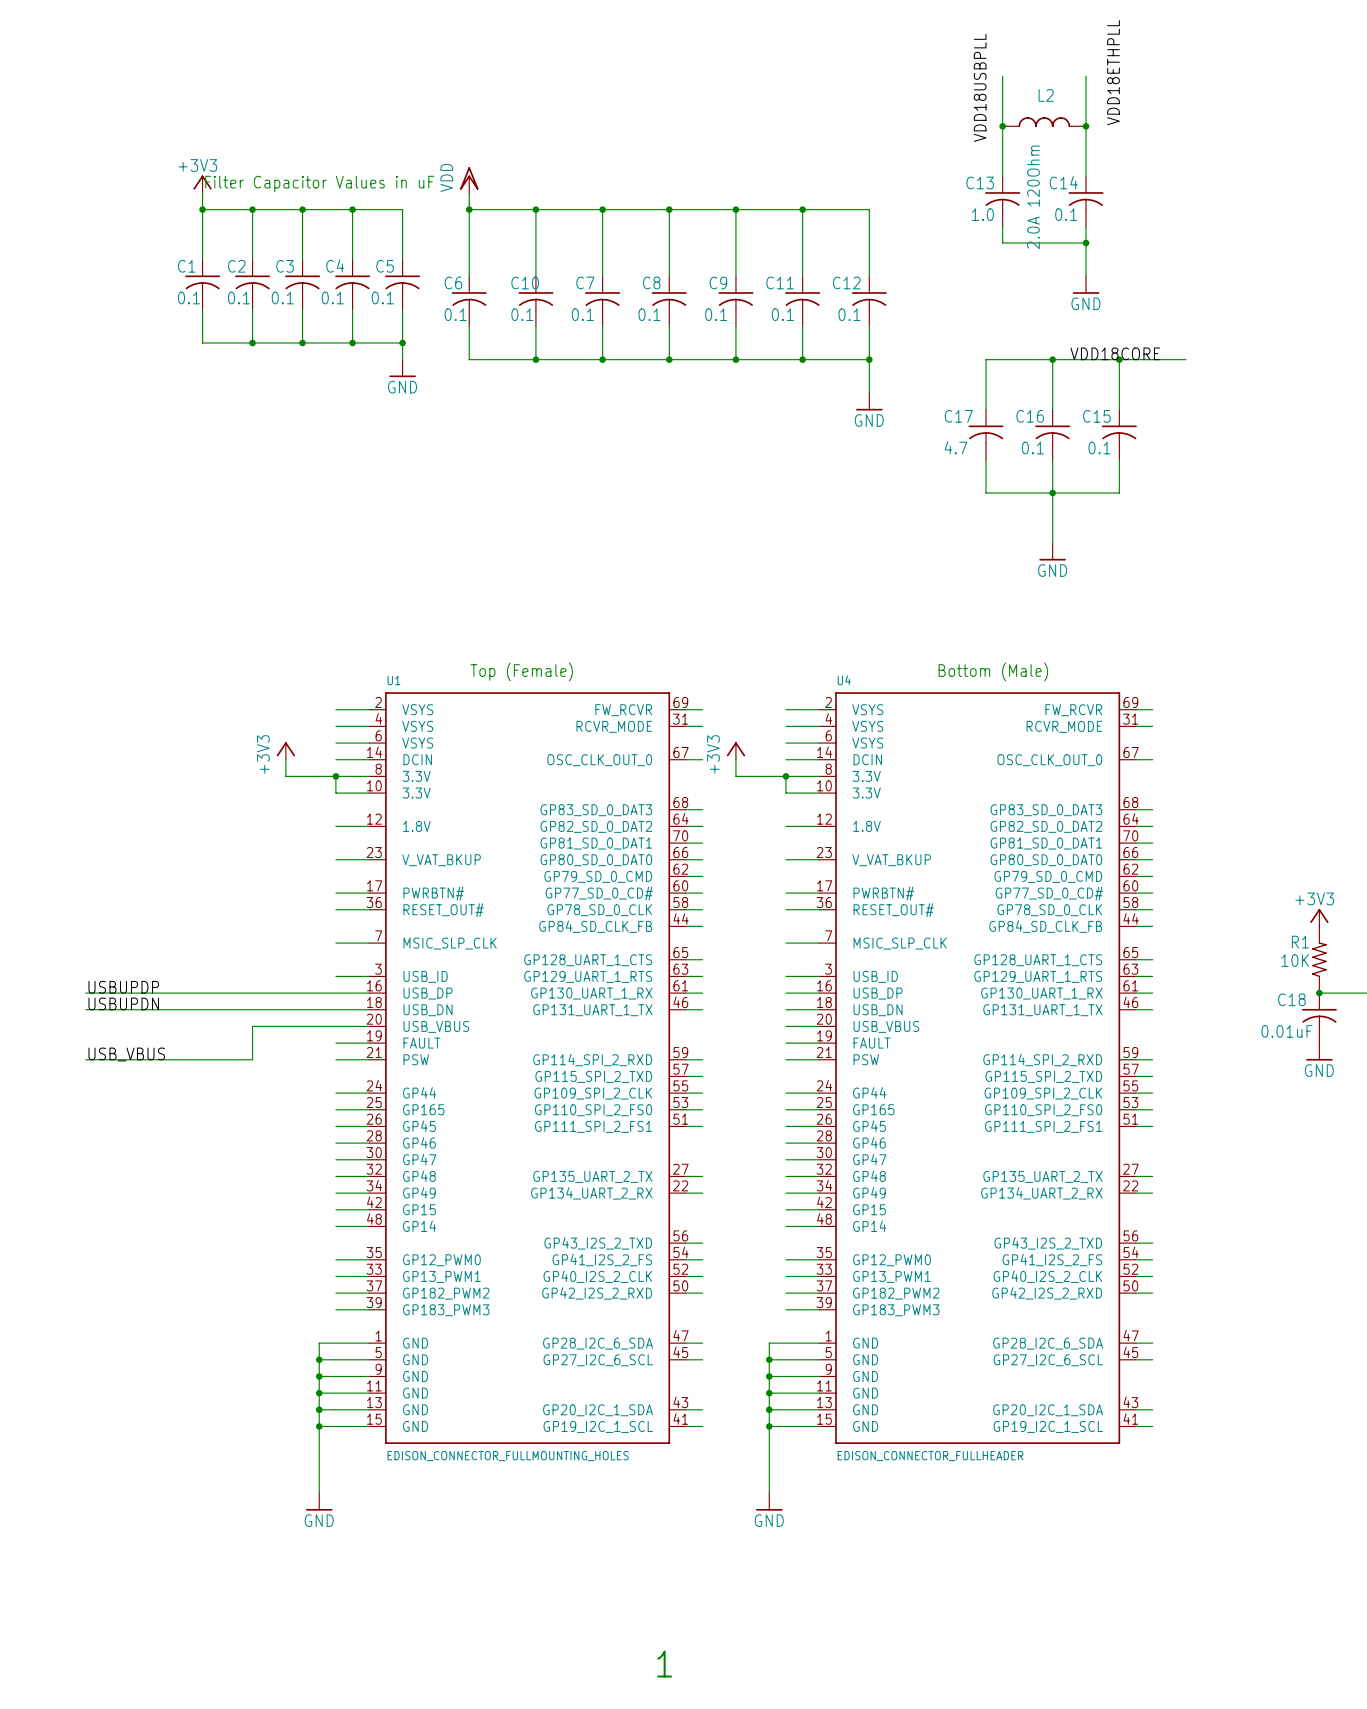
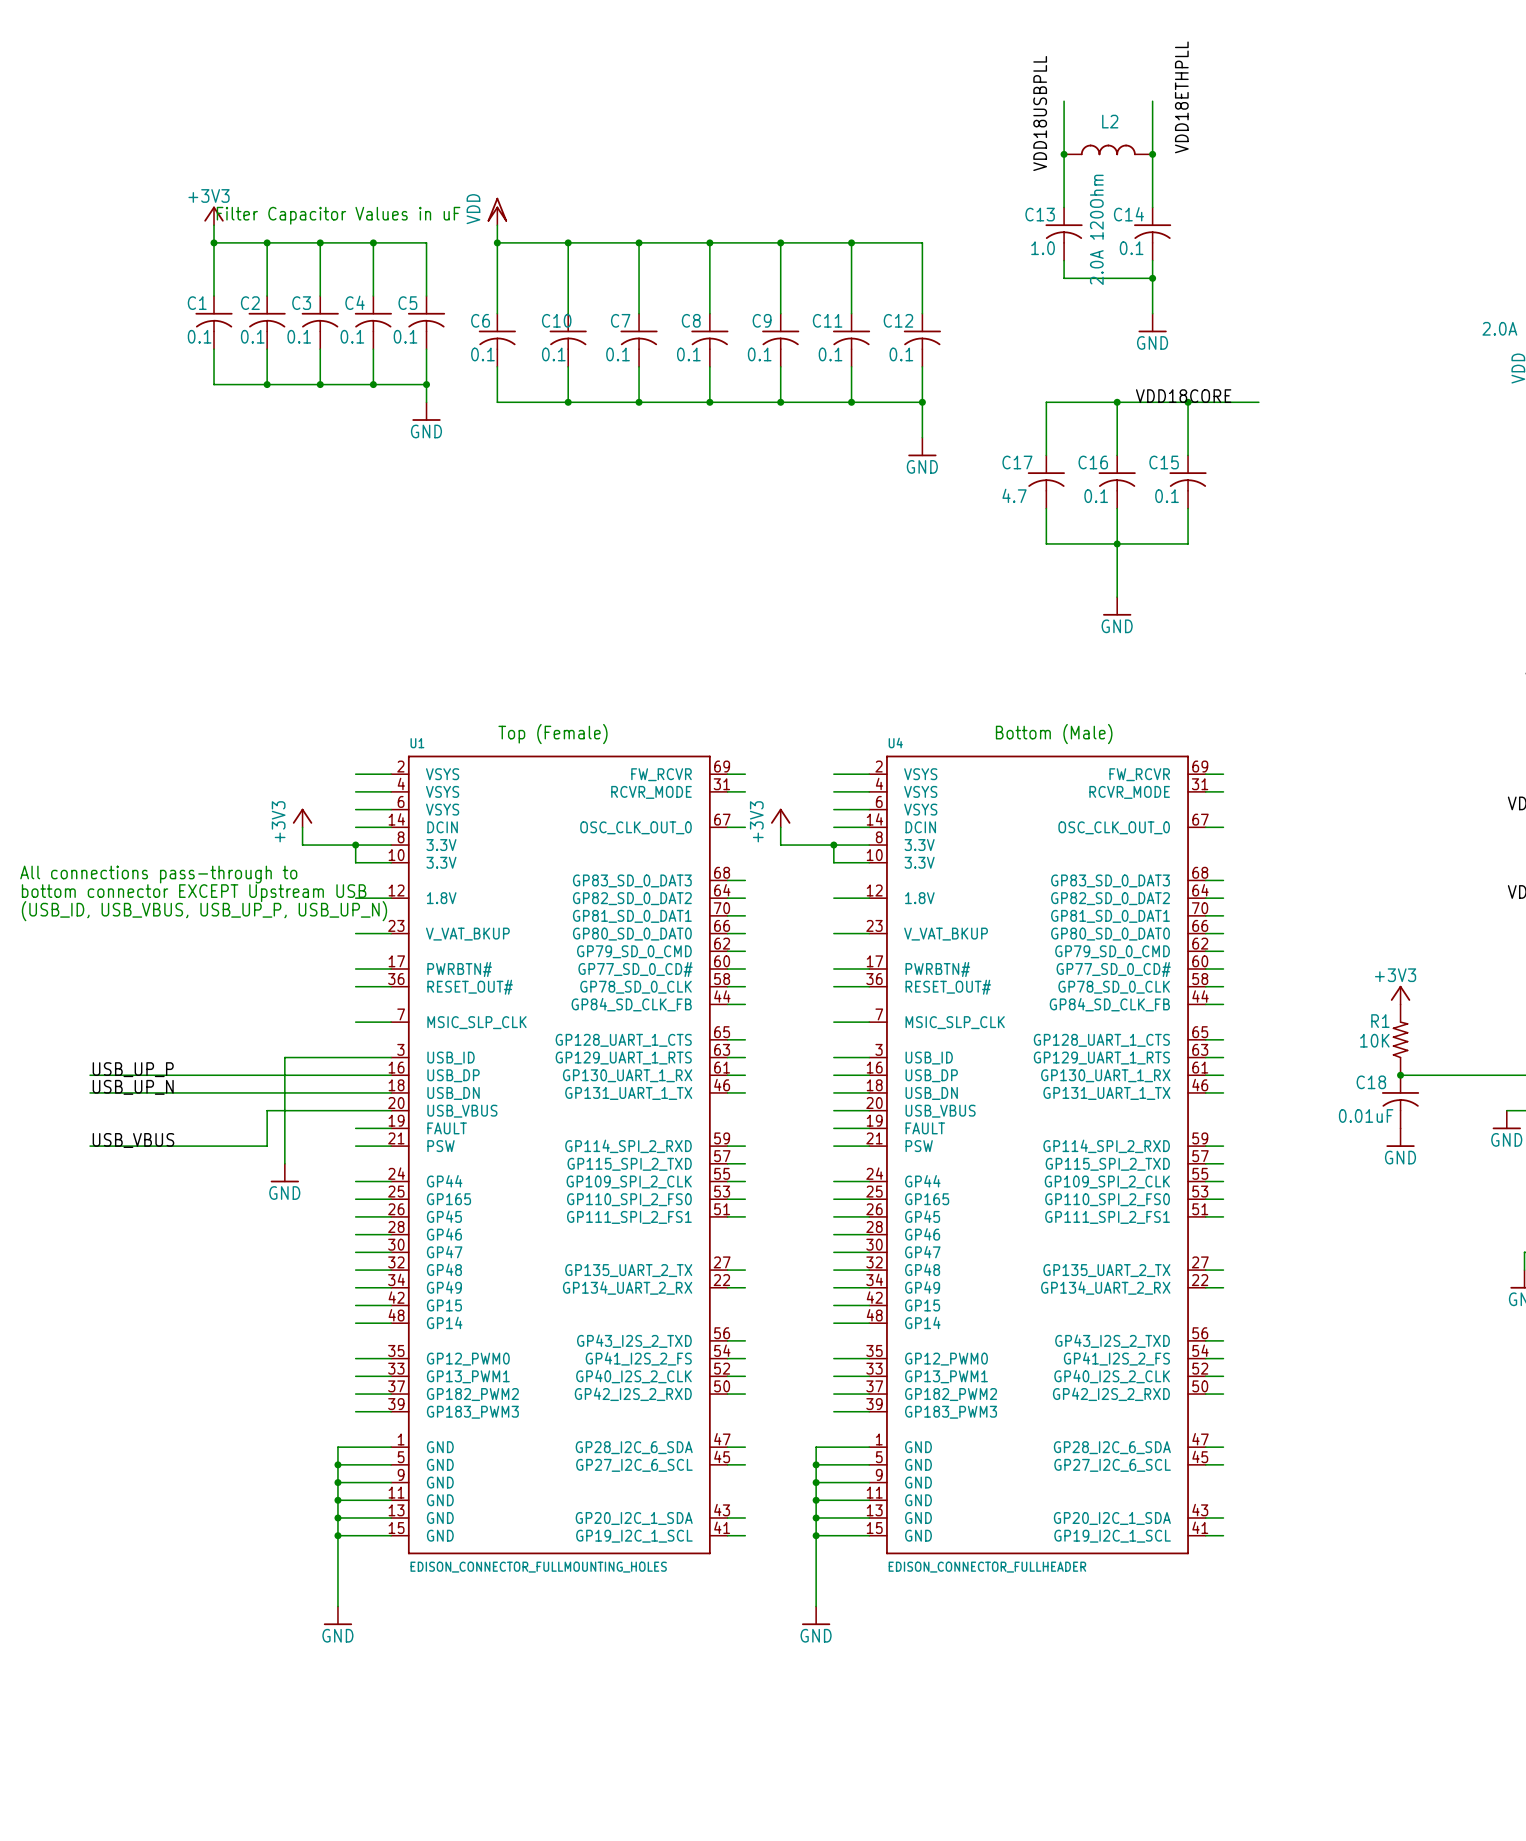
text: none -> All connections pass-through to (158, 874)
text: none -> bottom connector EXCEPT Upstream USB (194, 893)
text: none -> (USB_ID, USB_VBUS, USB_UP_P, USB_UP_N) (204, 911)
wire: none -> (355, 1057) (284, 1057) (284, 1163)
label: USBUPDP (123, 987) -> USB_UP_P (133, 1069)
label: USBUPDN (123, 1003) -> USB_UP_N (133, 1087)
power symbol: none -> GND (284, 1173)
text: 1 (664, 1664) -> none

